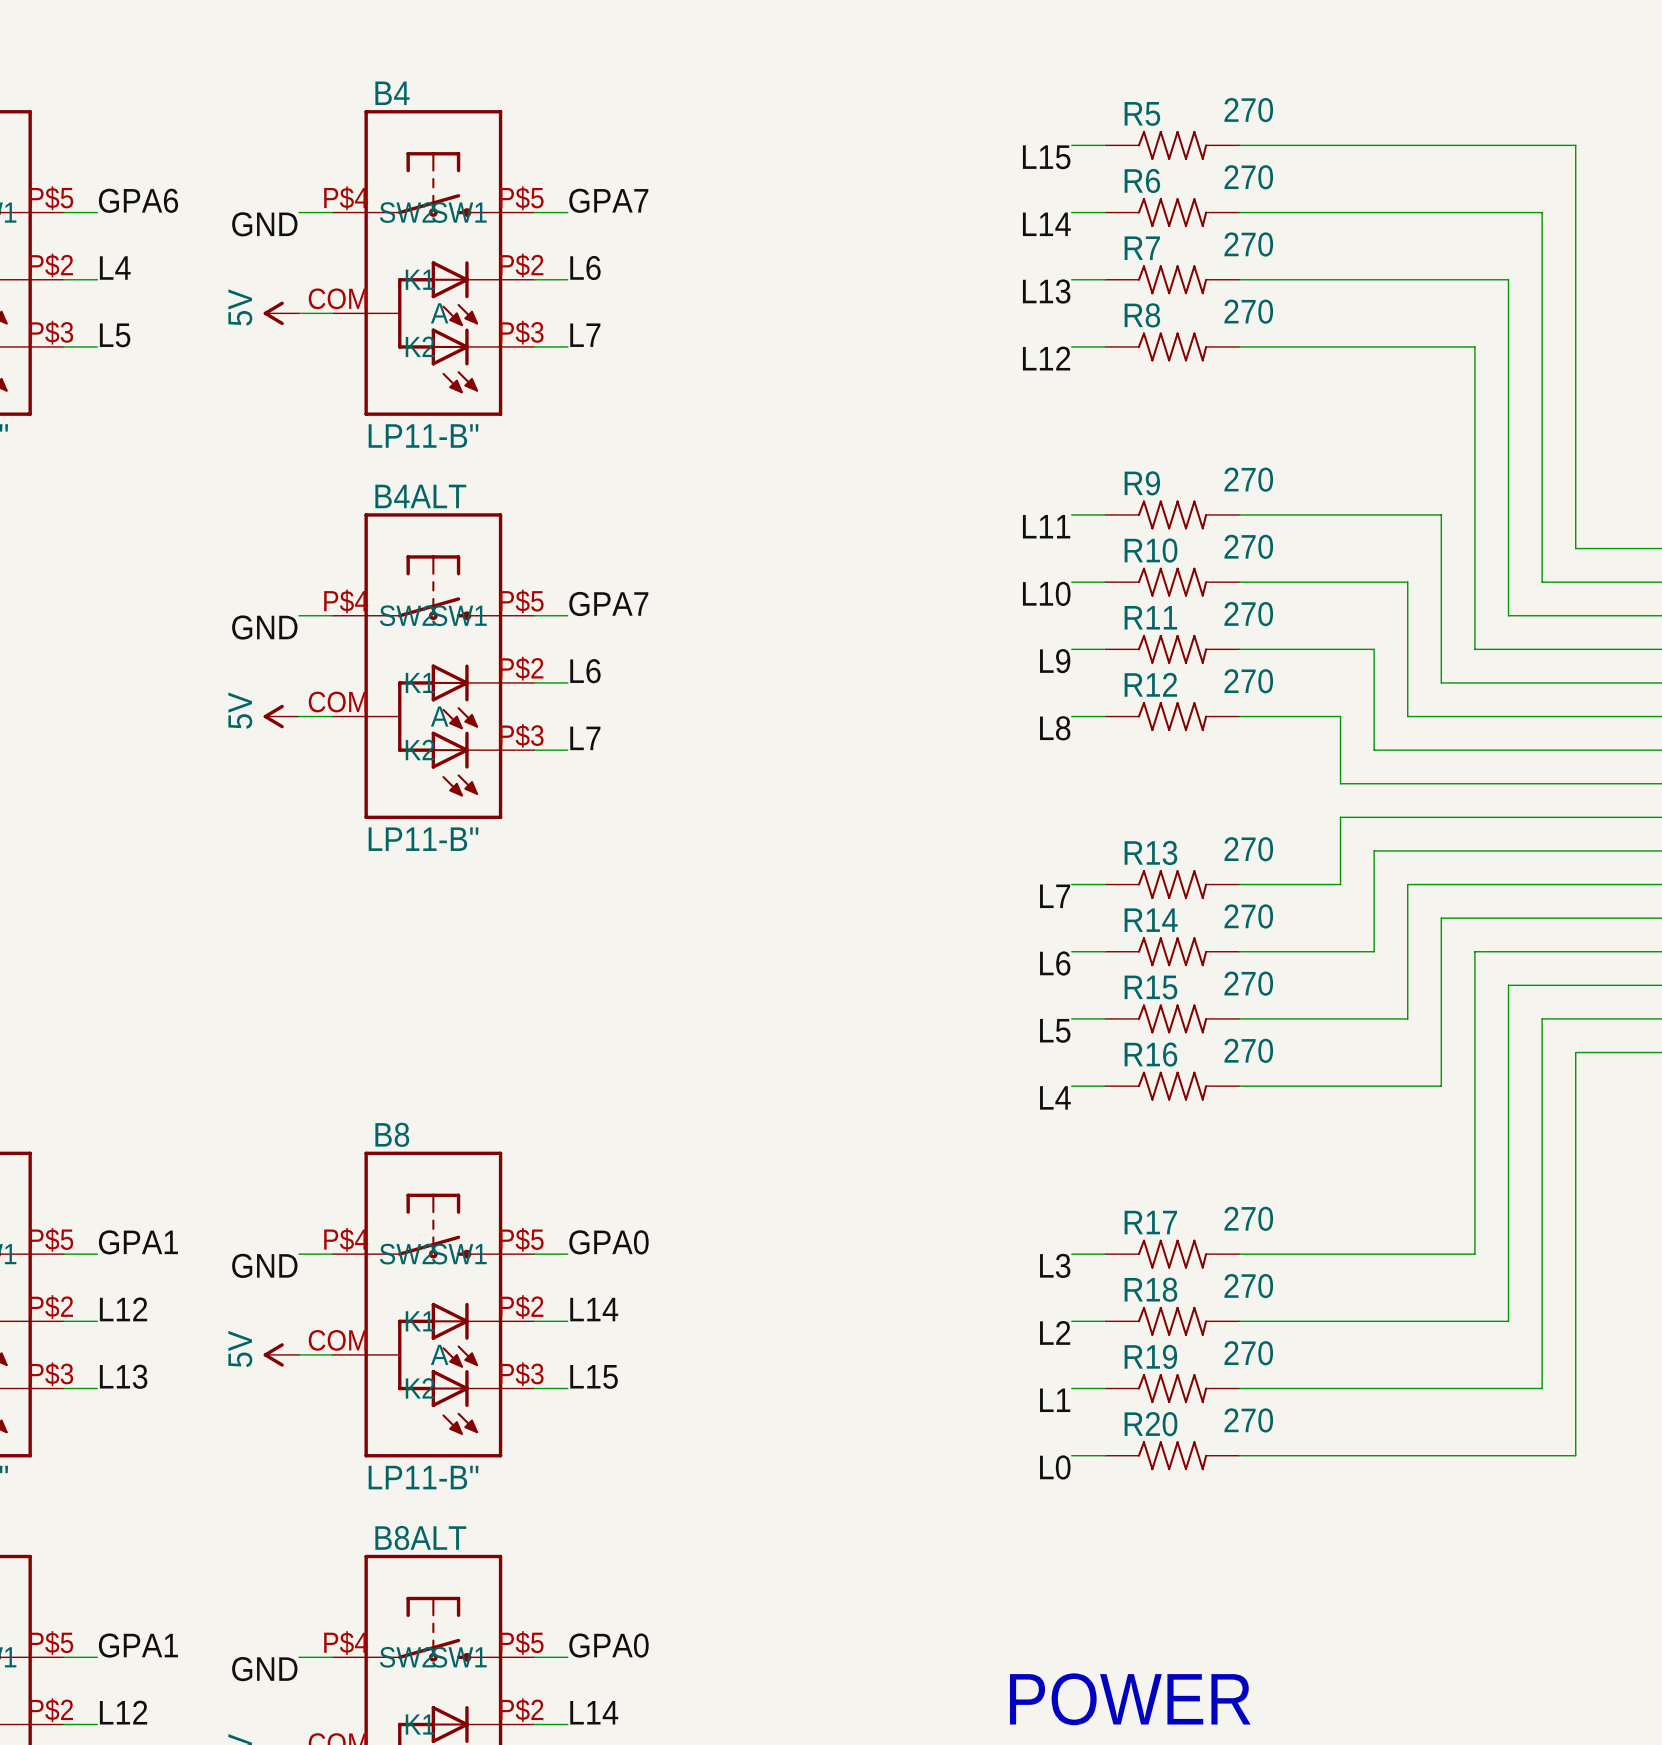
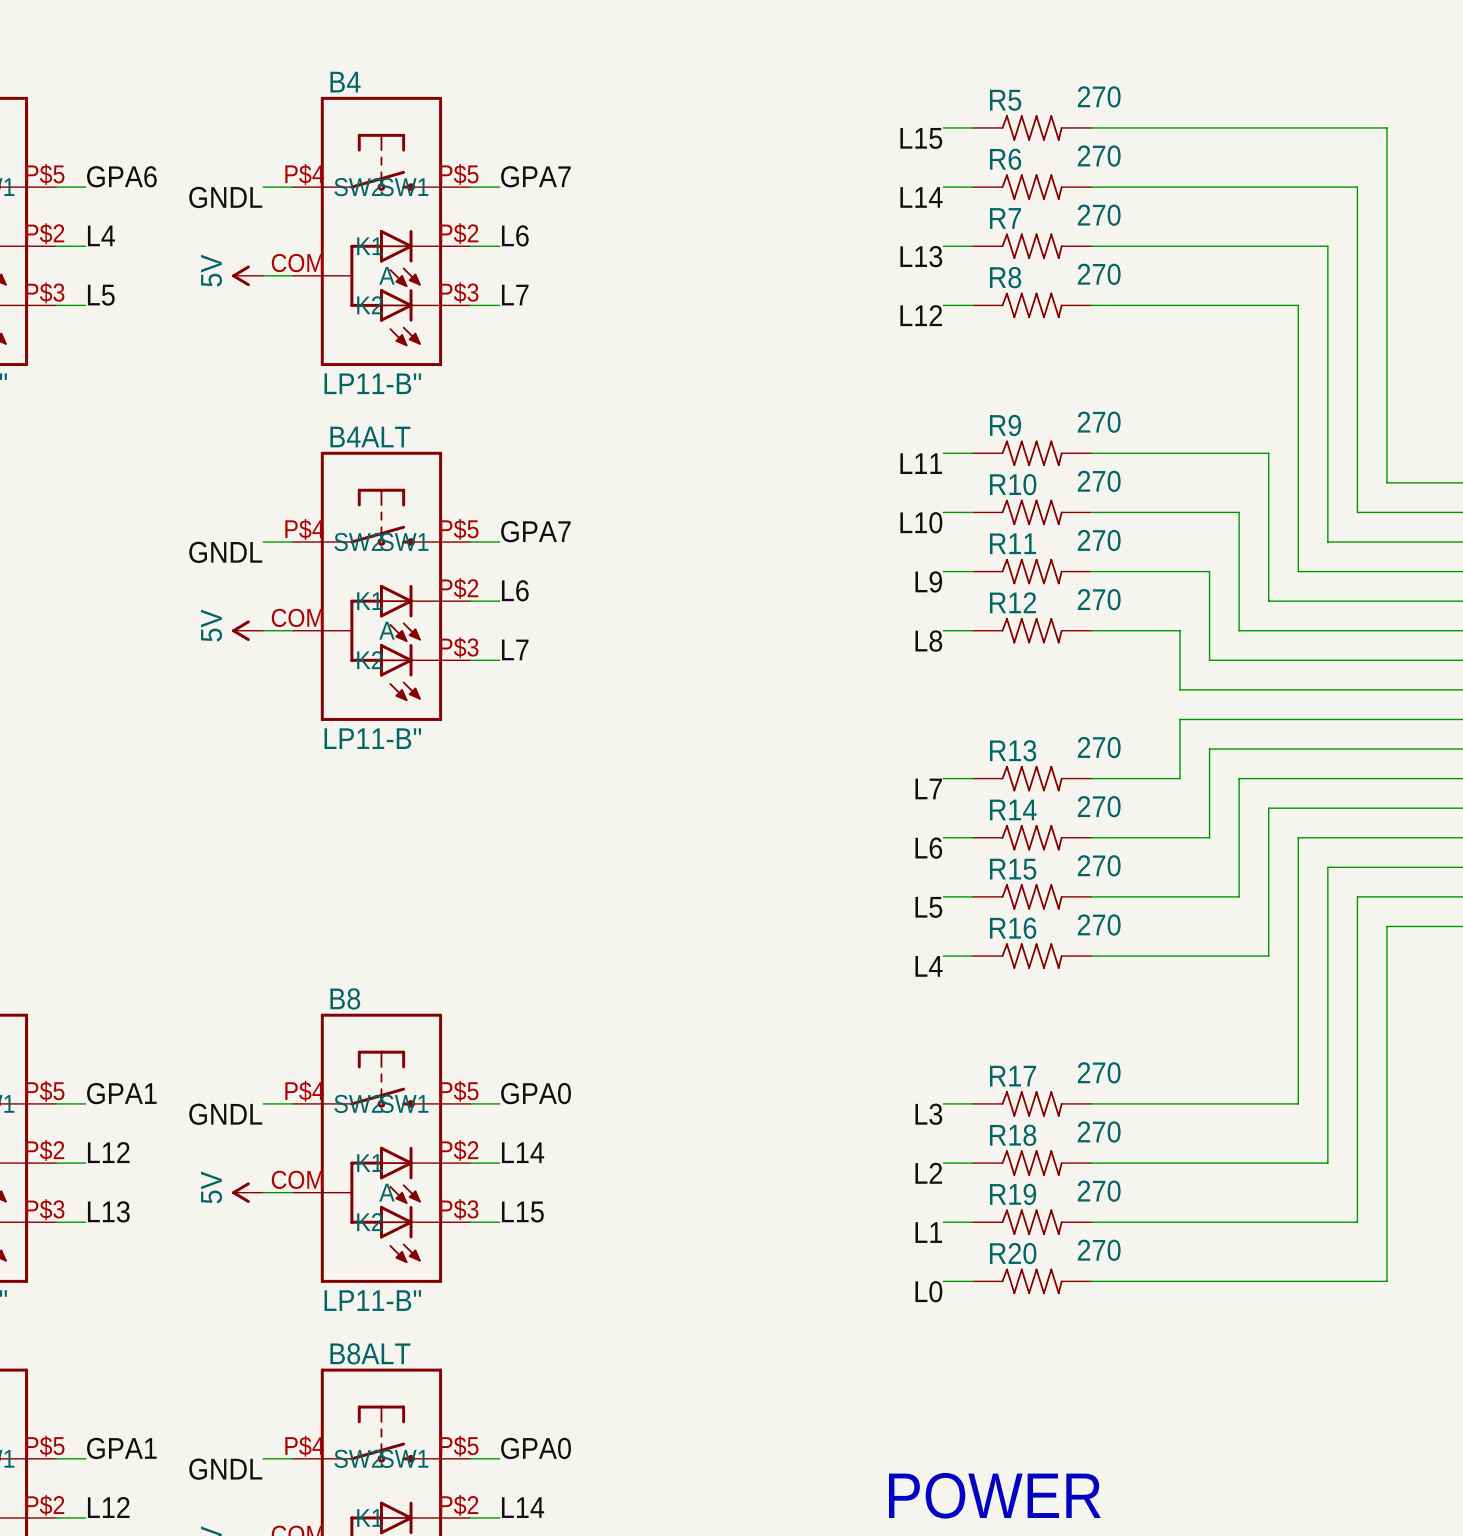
label: GND (264, 224) -> GNDL (225, 197)
label: GND (264, 627) -> GNDL (225, 552)
label: GND (264, 1265) -> GNDL (225, 1114)
label: GND (264, 1669) -> GNDL (225, 1469)

